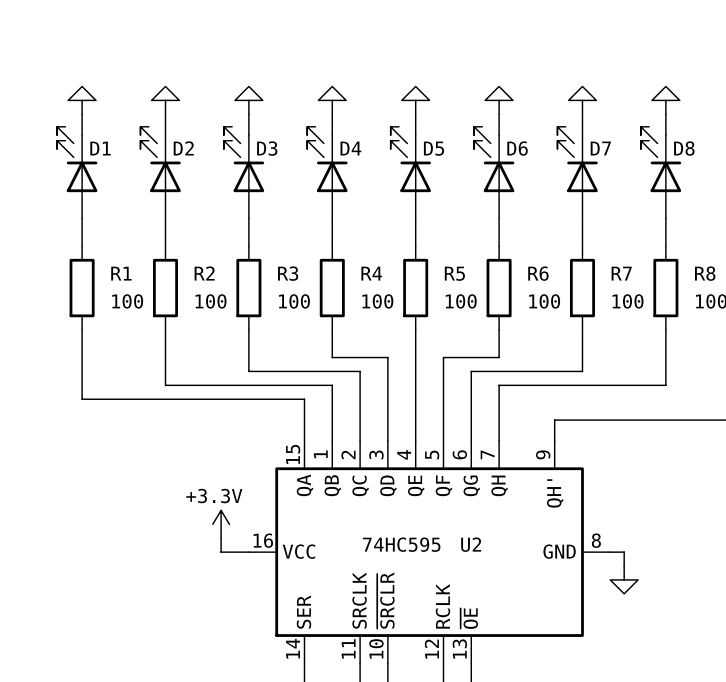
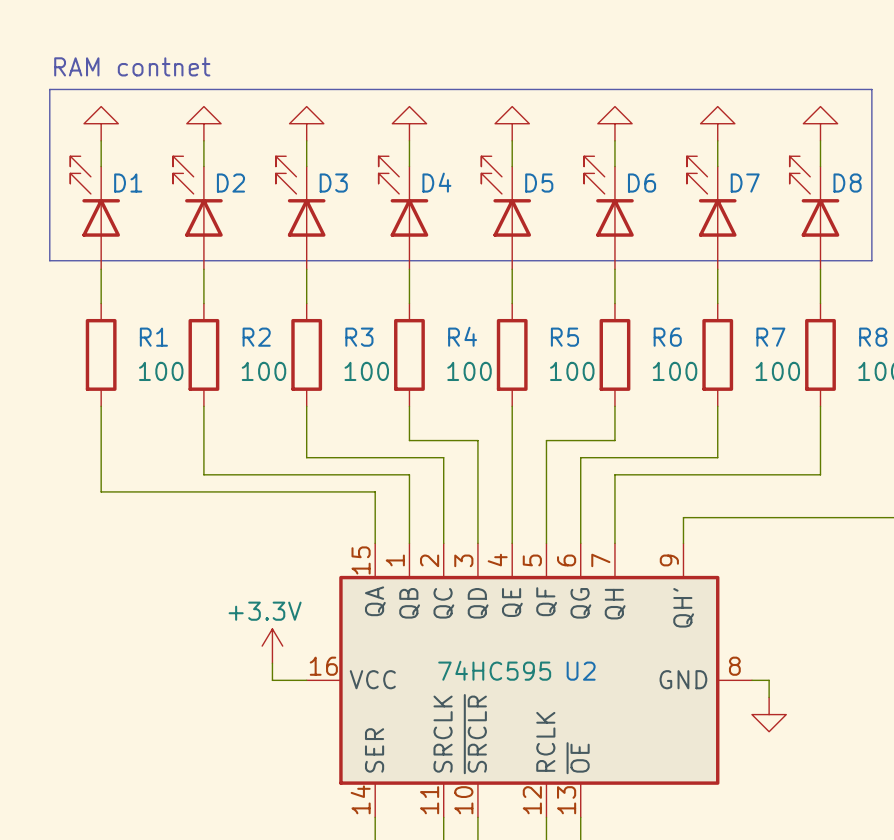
text: none -> RAM contnet (132, 66)
line: none -> (49, 89) (871, 89) (871, 260) (49, 260) (49, 89)

